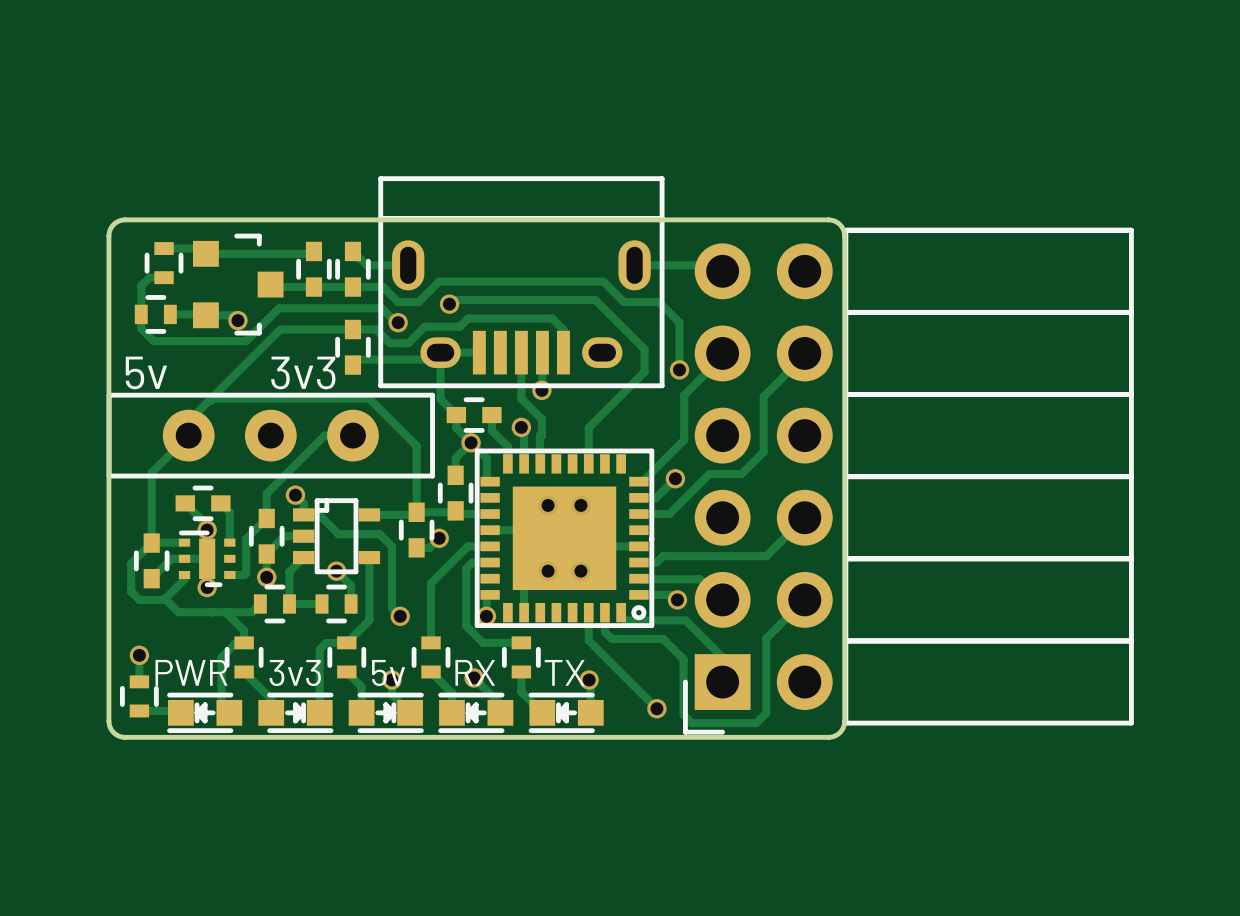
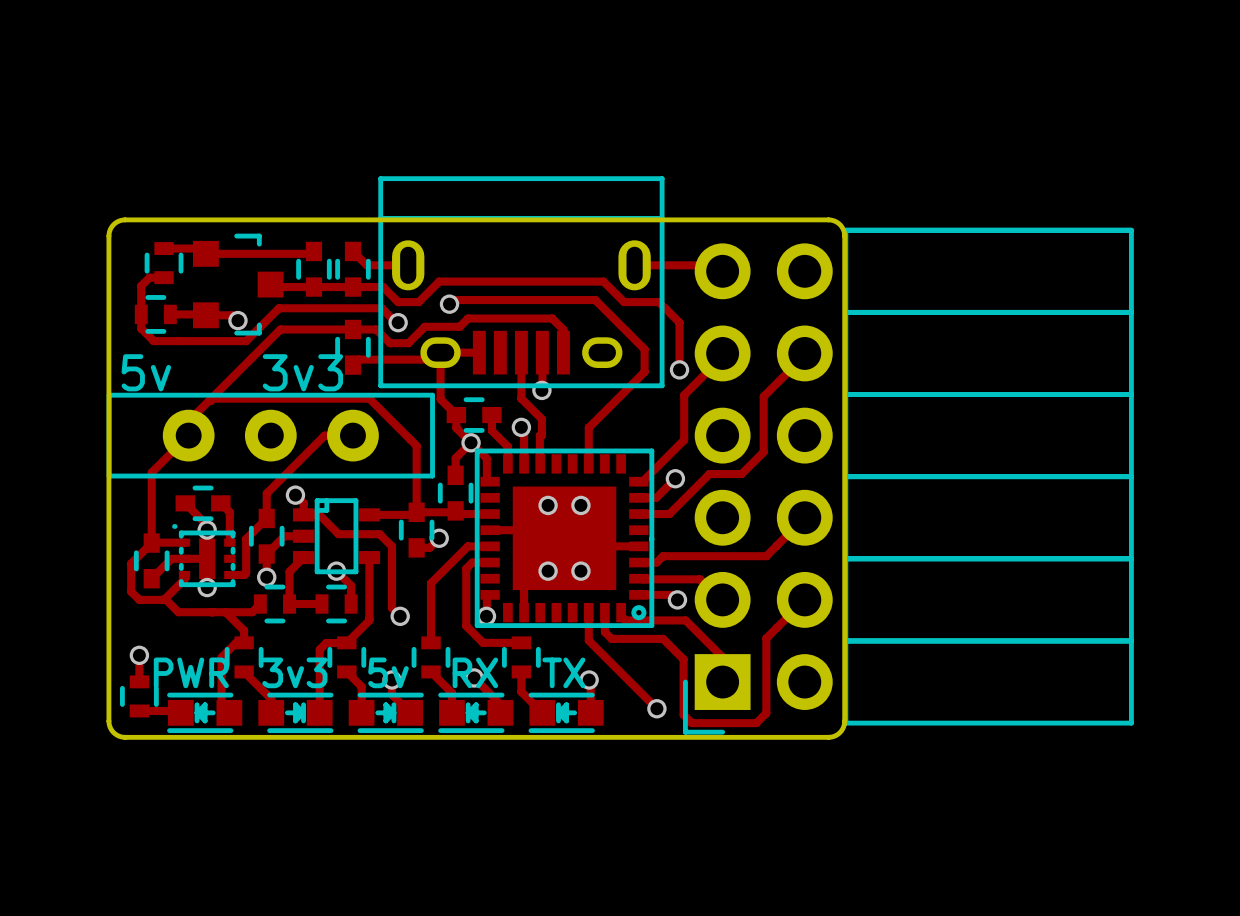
part footprint: [178, 530, 236, 588] -> [172, 524, 236, 588]

